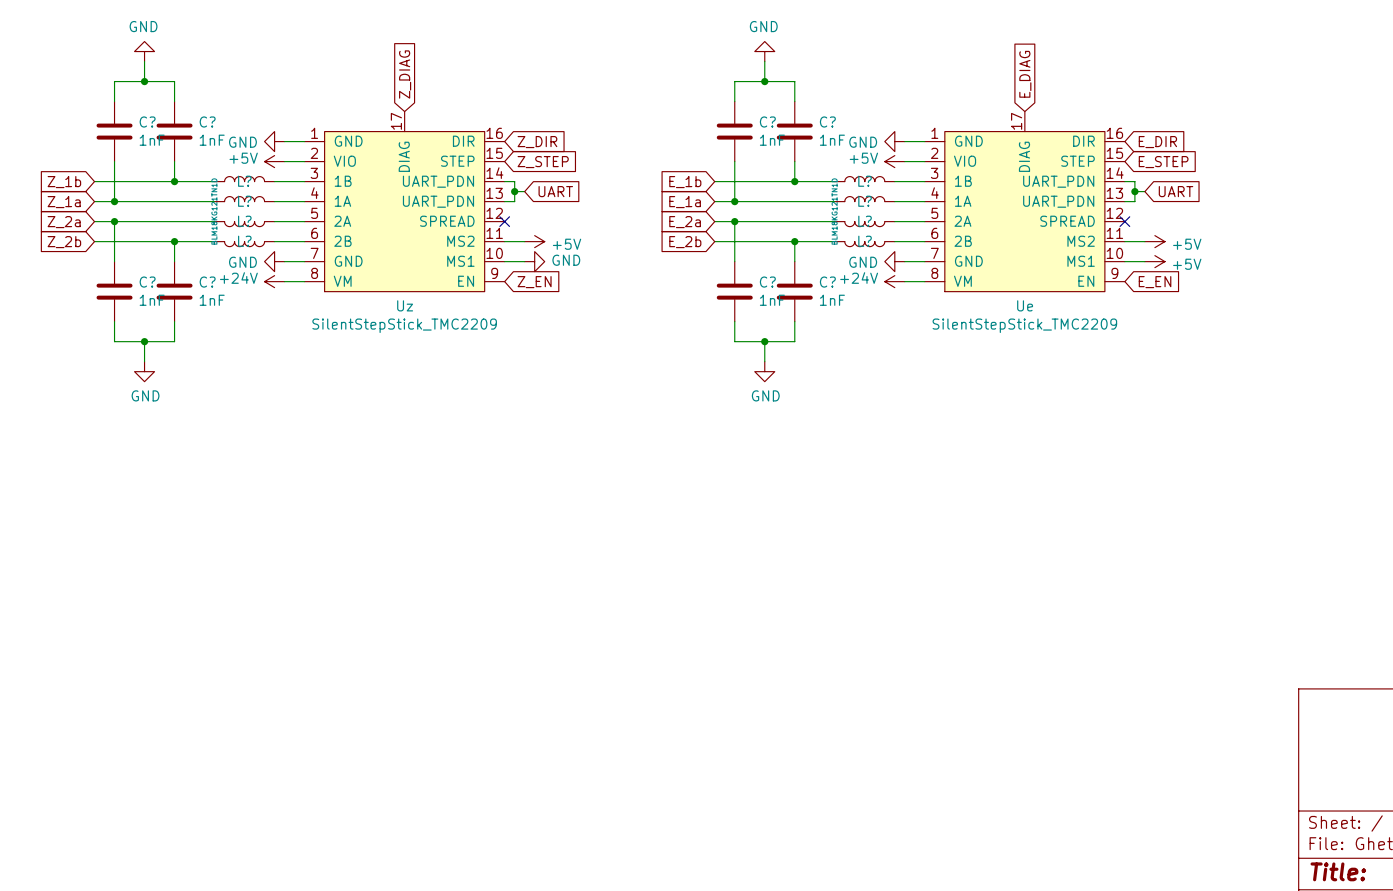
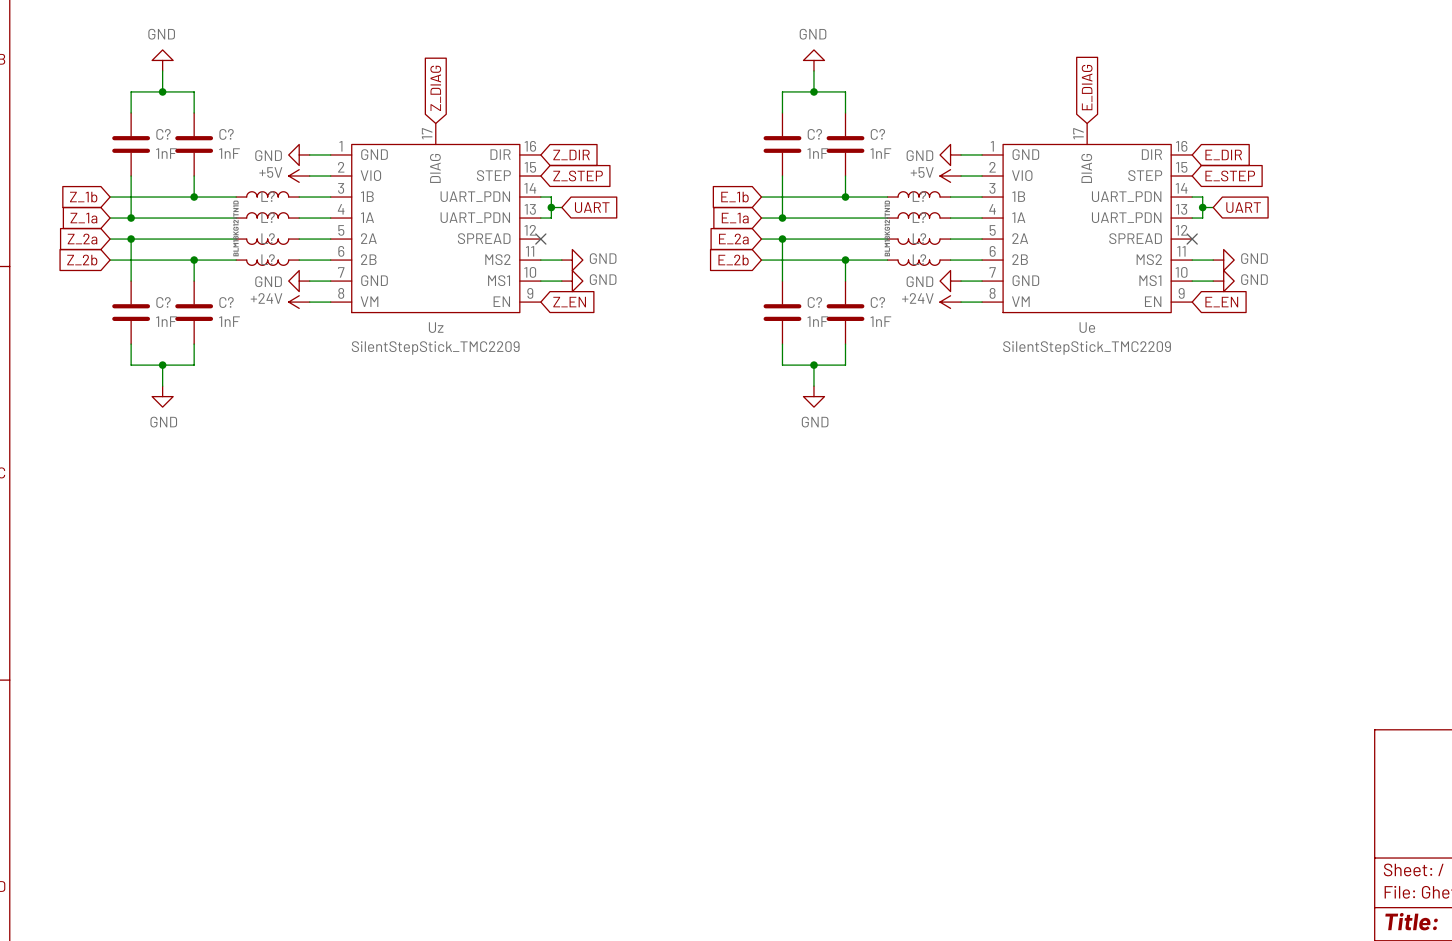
power symbol: +5V (534, 241) -> GND (572, 260)
power symbol: +5V (1154, 241) -> GND (1223, 260)
power symbol: +5V (1154, 261) -> GND (1223, 281)

